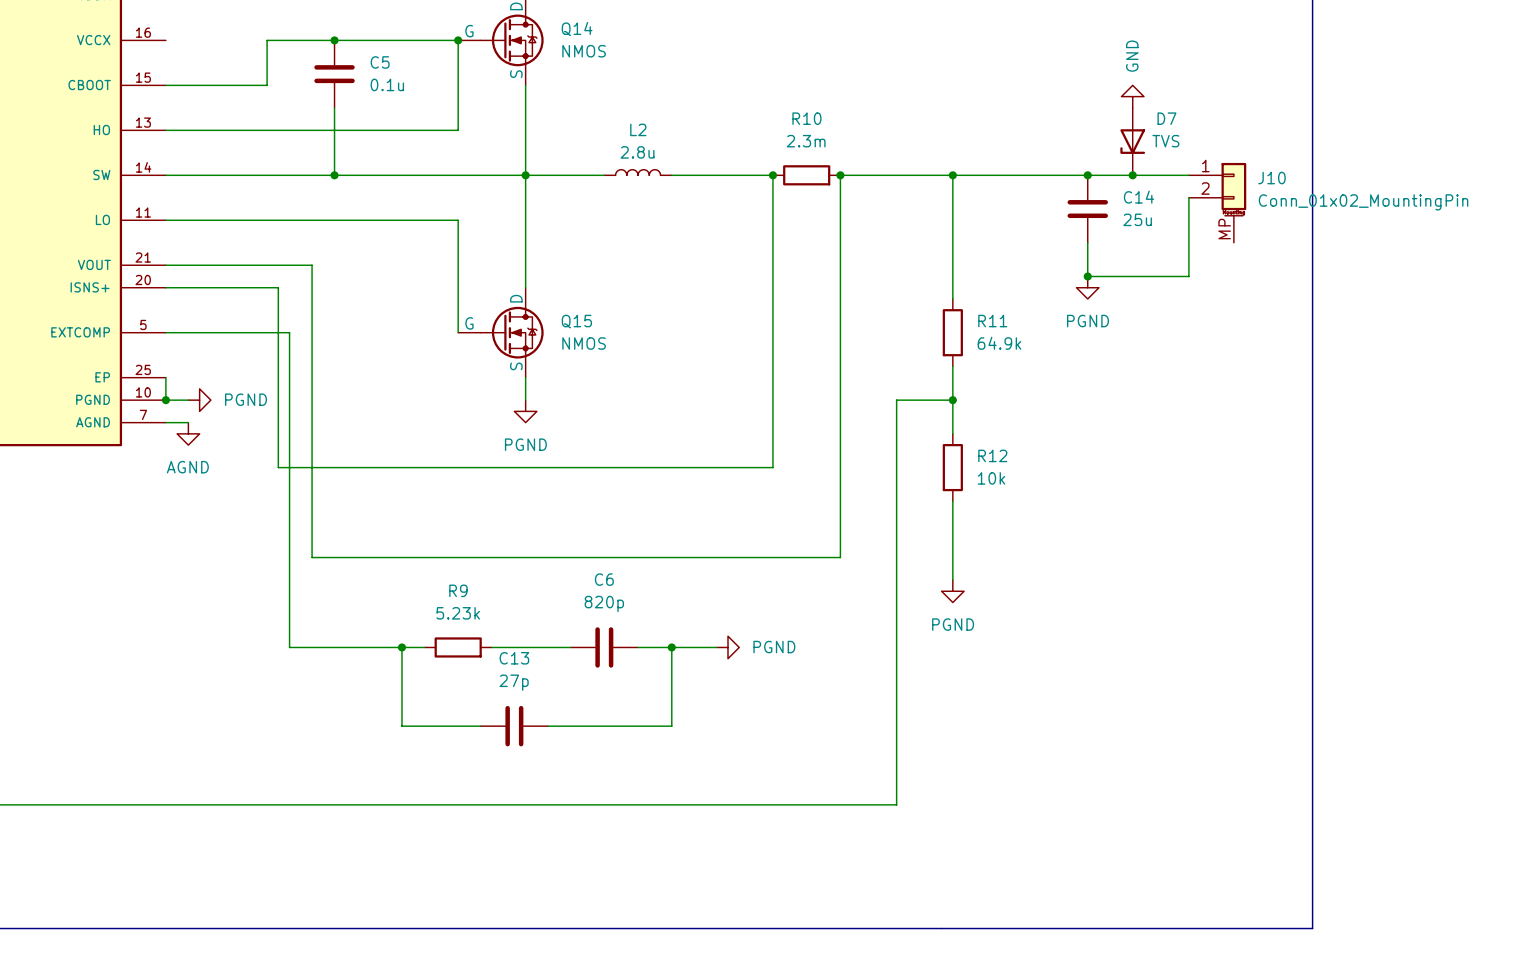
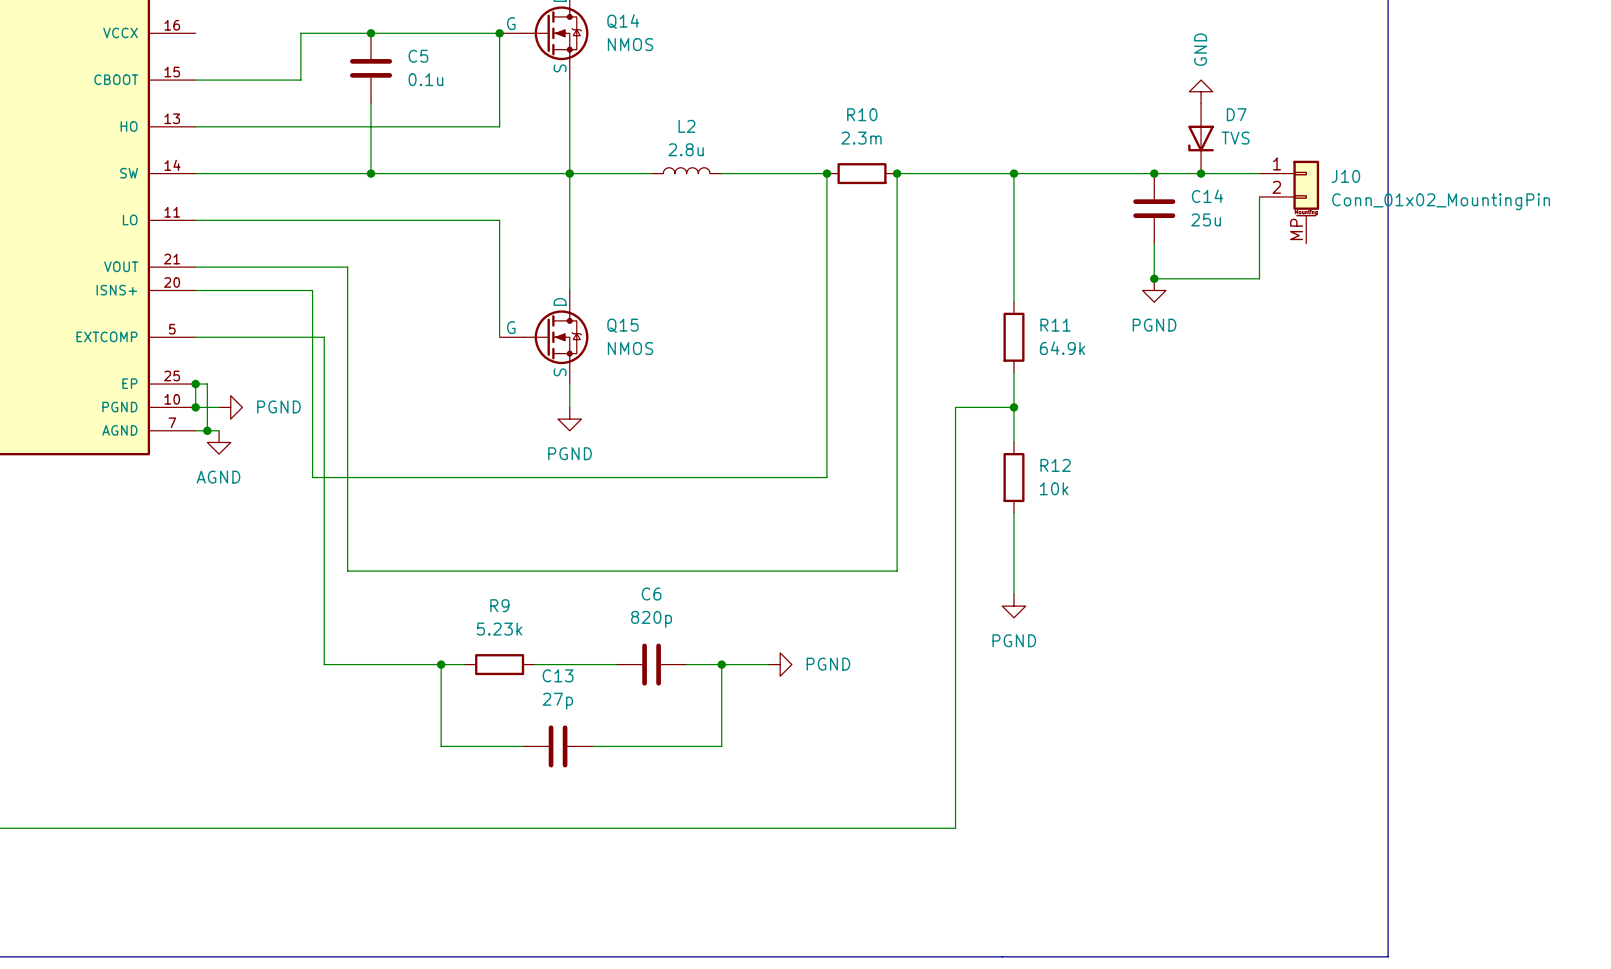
wire: none -> (195, 384) (207, 384) (207, 430)
junction: none -> (195, 384)
junction: none -> (207, 430)

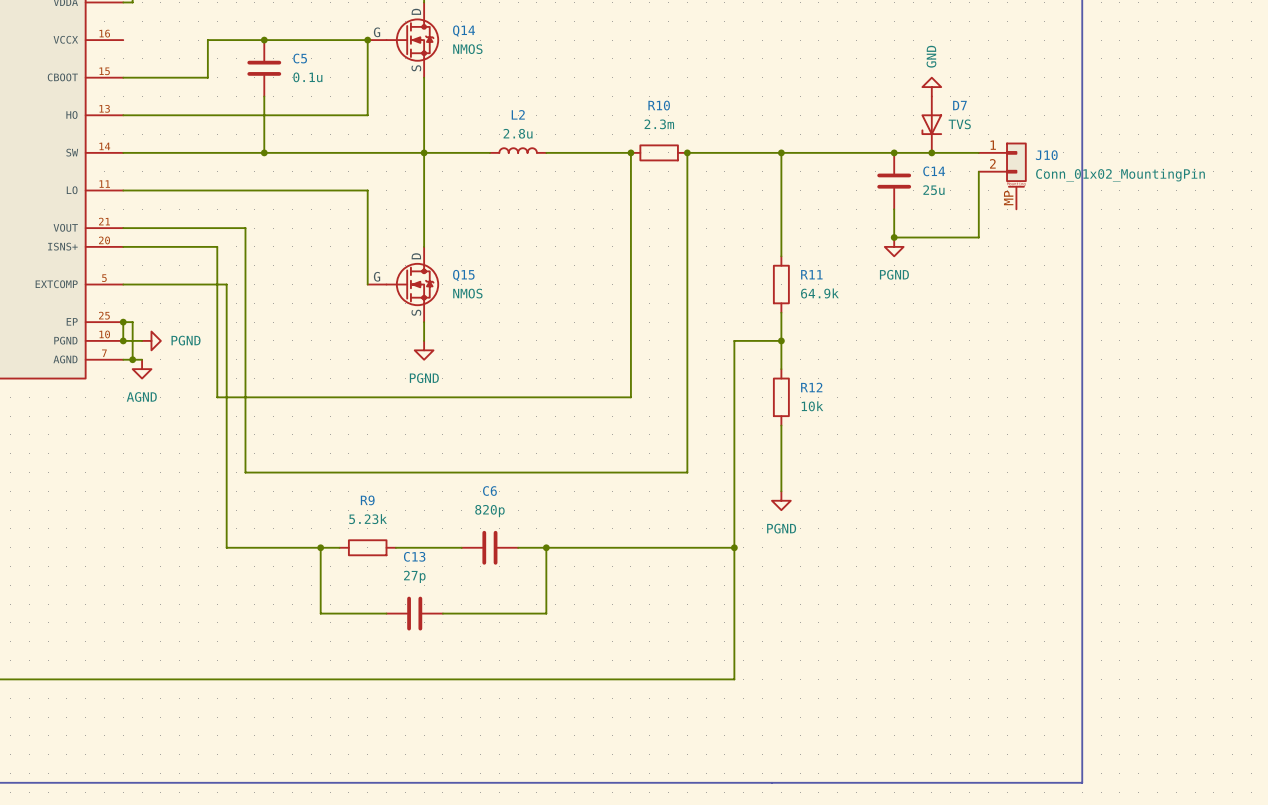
wire: none -> (583, 547) (734, 547)
power symbol: PGND (780, 664) -> none
junction: none -> (734, 547)

